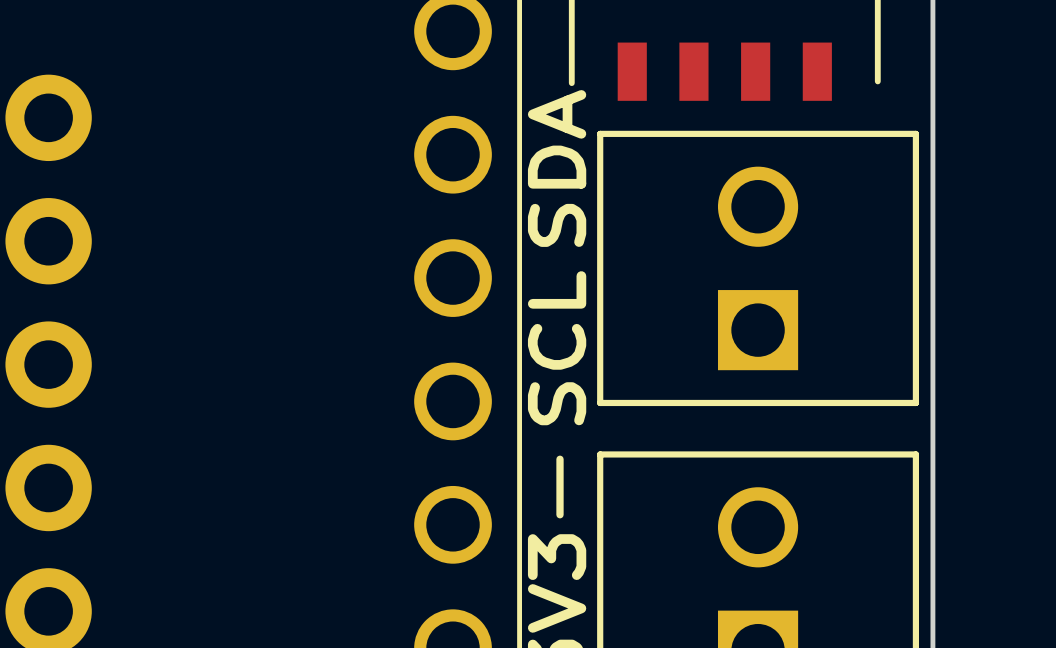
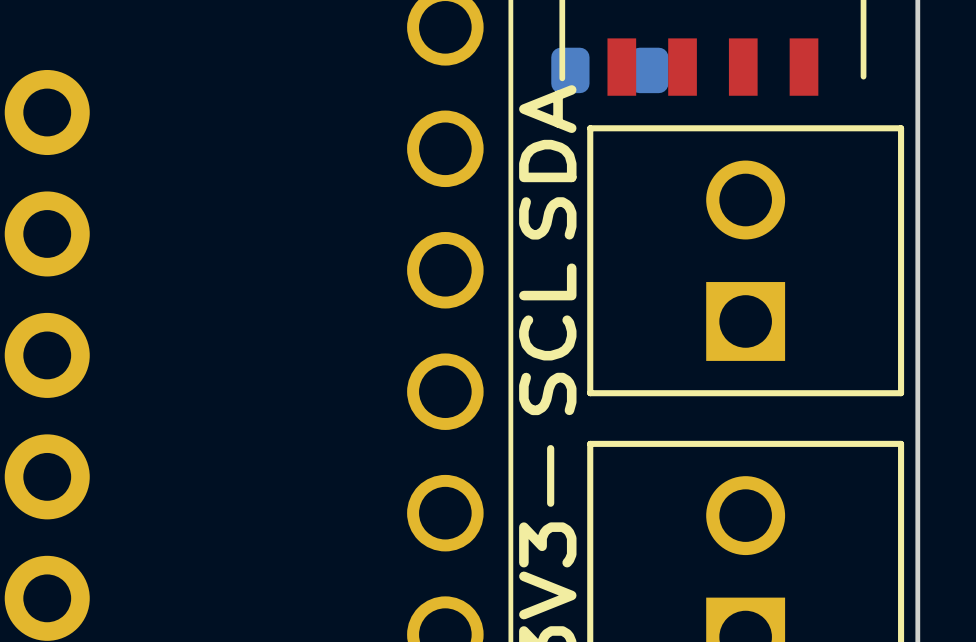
part: none -> (609, 70)

